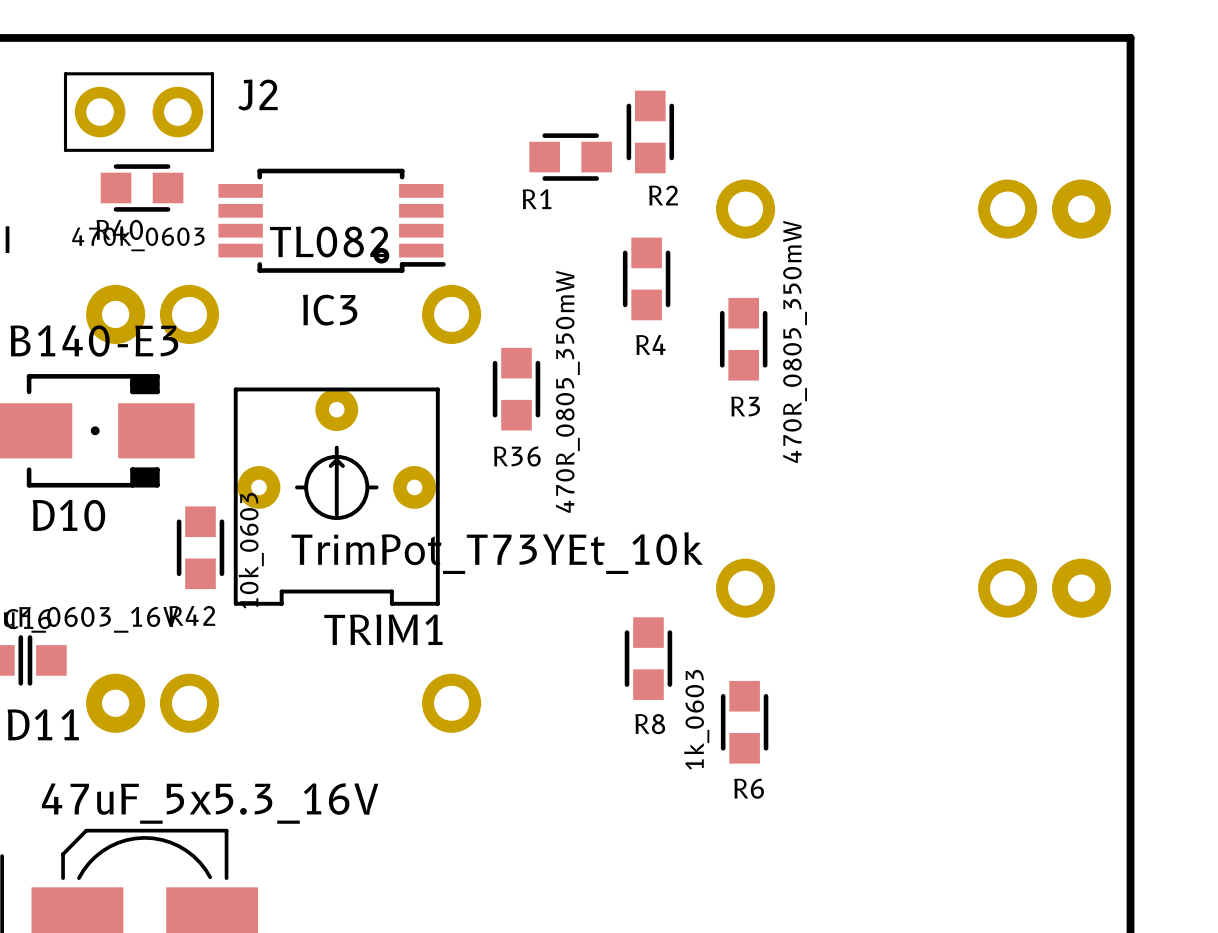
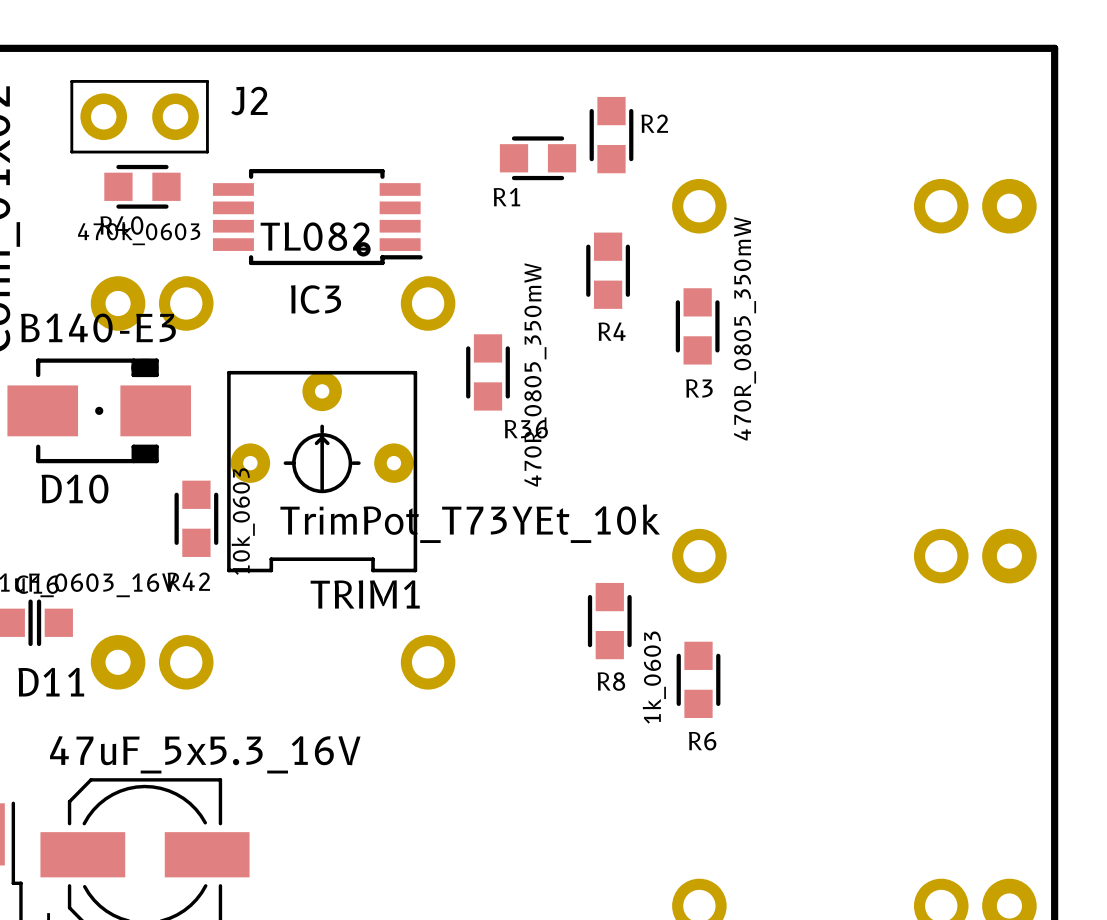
R2 name position: R2 (663, 195) -> R2 (654, 123)
R36 name position: R36 (517, 456) -> R36 (526, 429)

